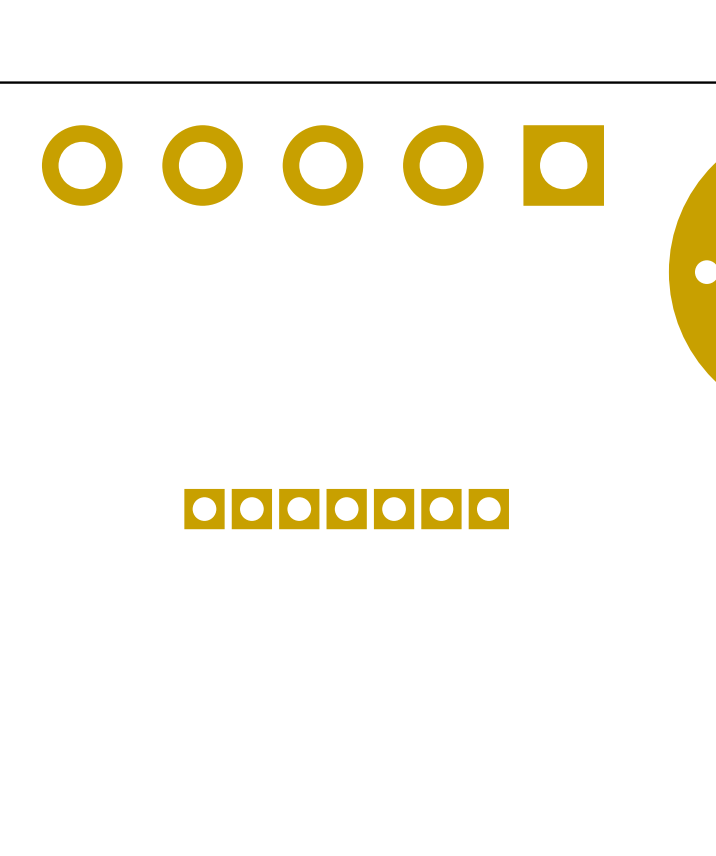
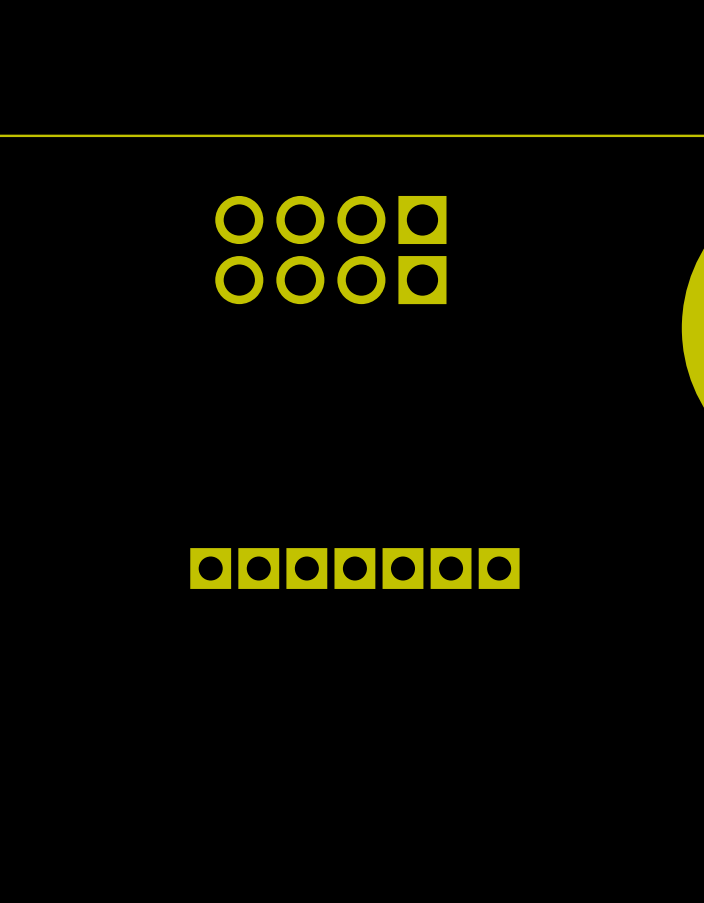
part footprint: [41, 125, 604, 206] -> [215, 195, 447, 245]
part: none -> (330, 280)

